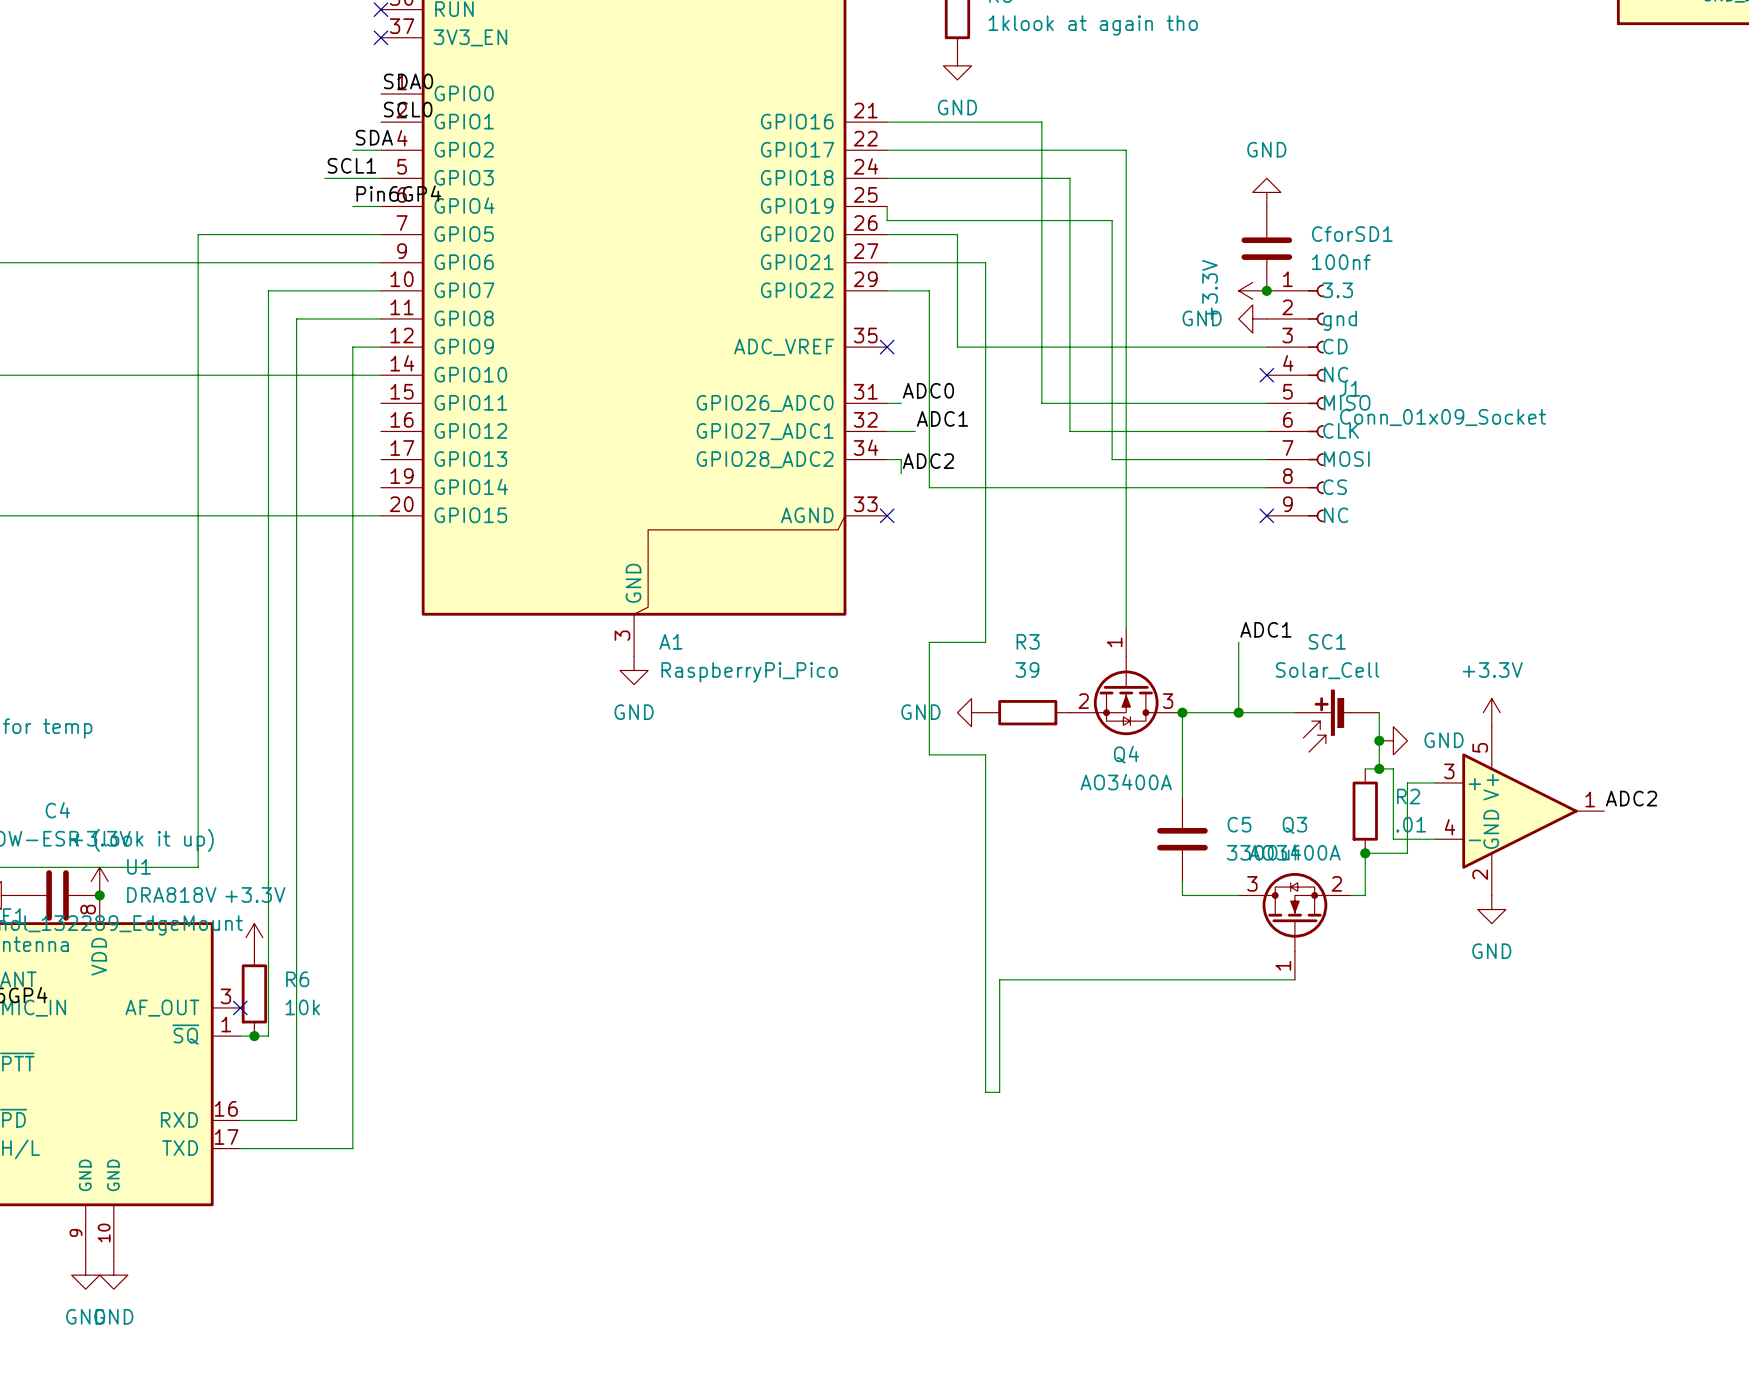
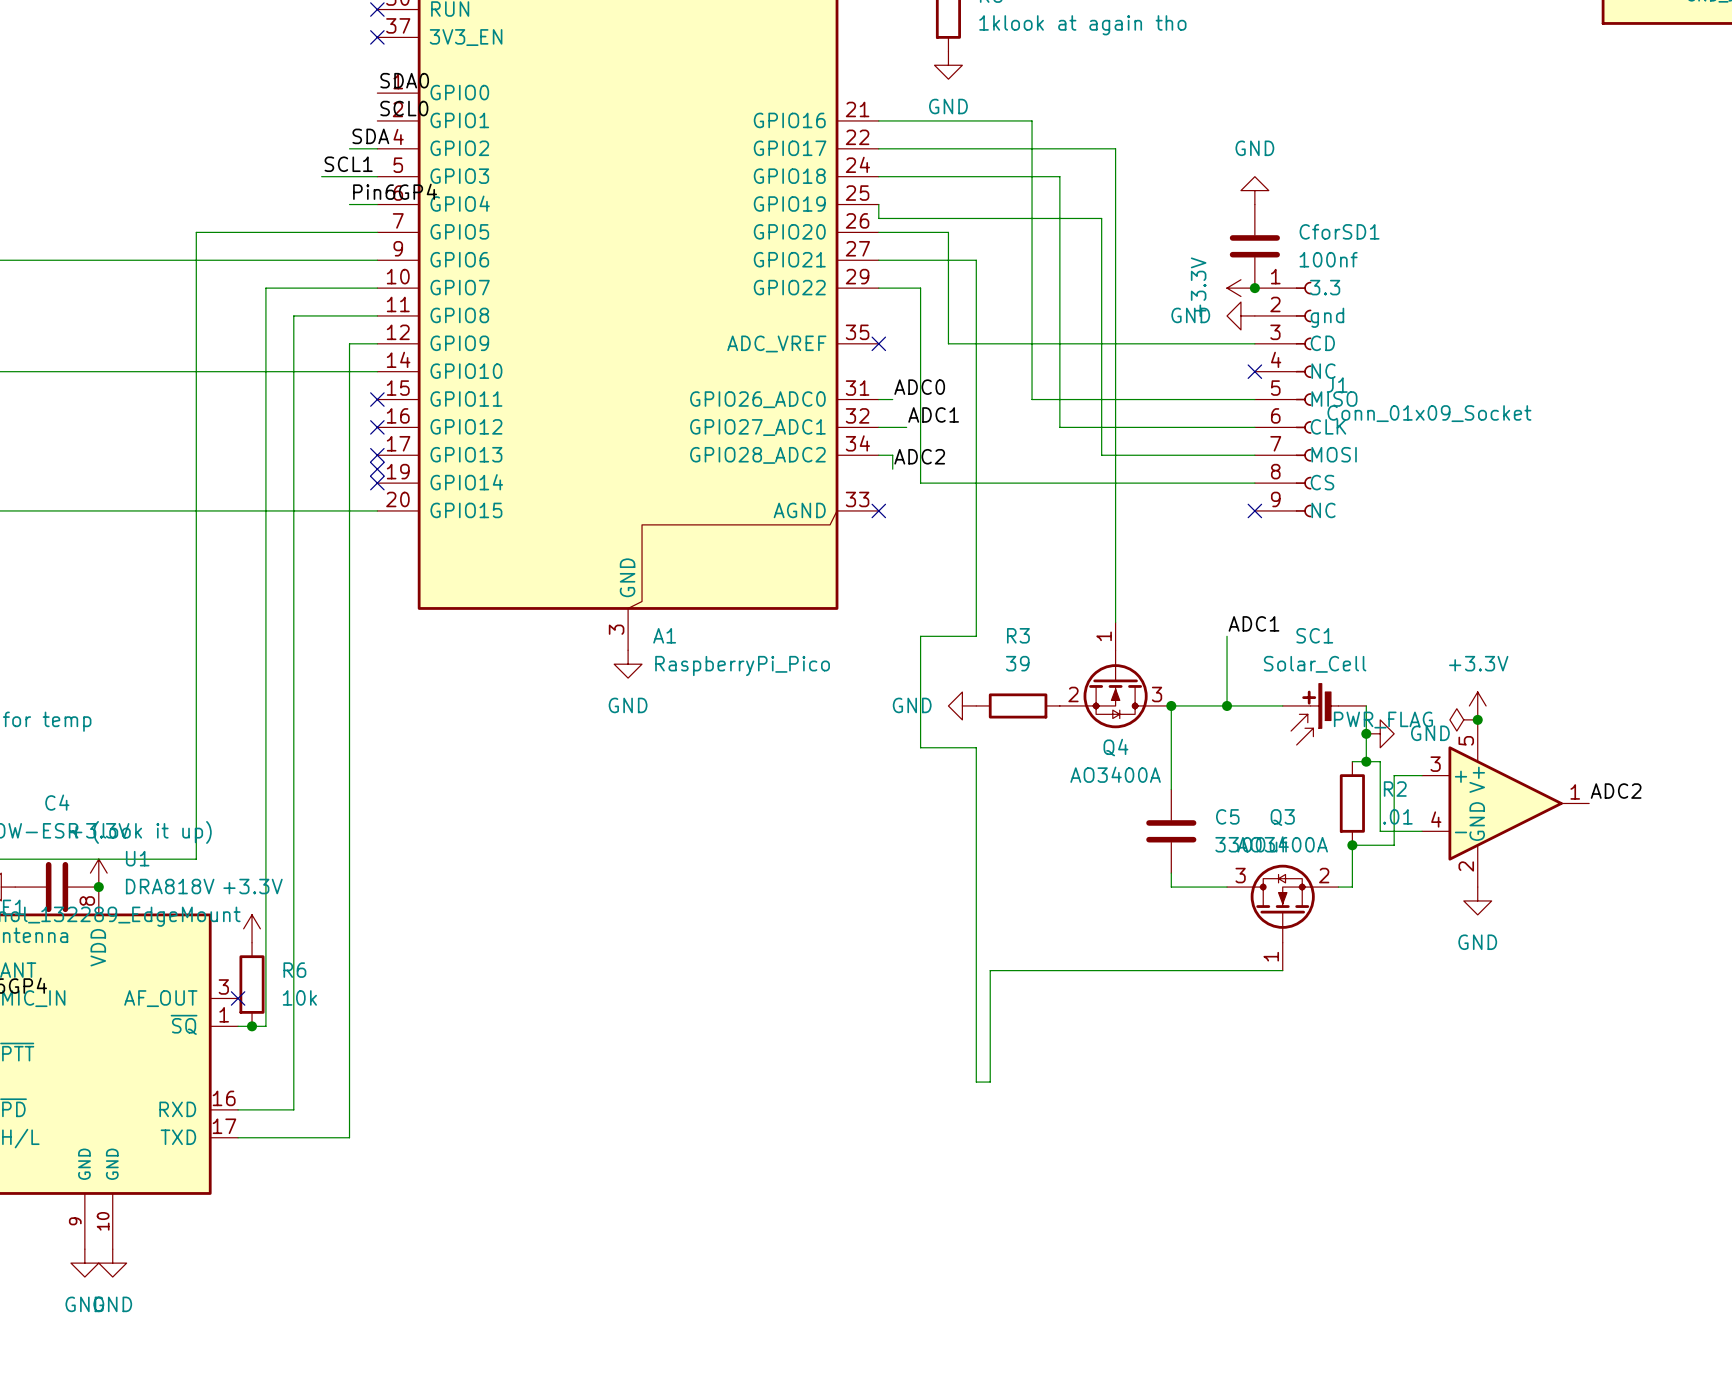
no-connect mark: none -> (377, 399)
no-connect mark: none -> (377, 427)
no-connect mark: none -> (377, 455)
no-connect mark: none -> (377, 469)
no-connect mark: none -> (377, 483)
power symbol: none -> PWR_FLAG (1463, 719)
junction: none -> (1477, 719)

